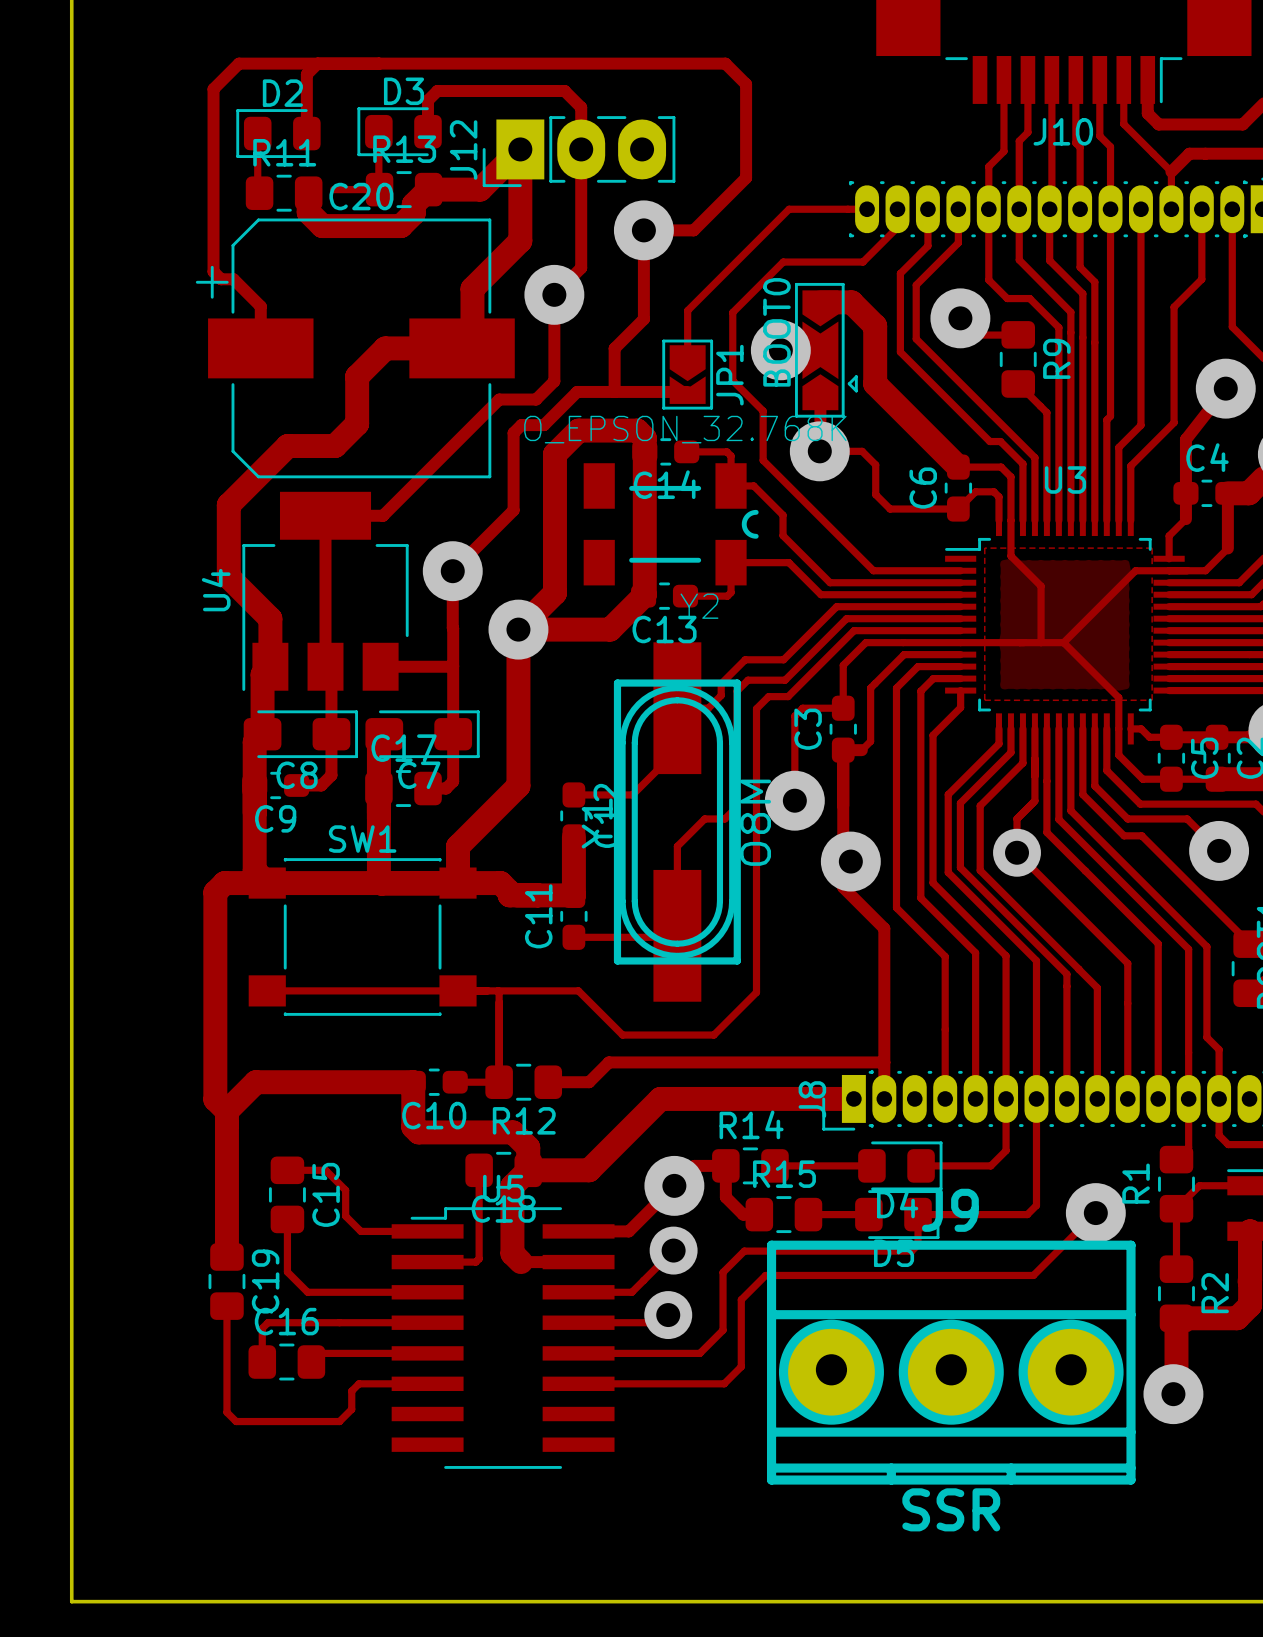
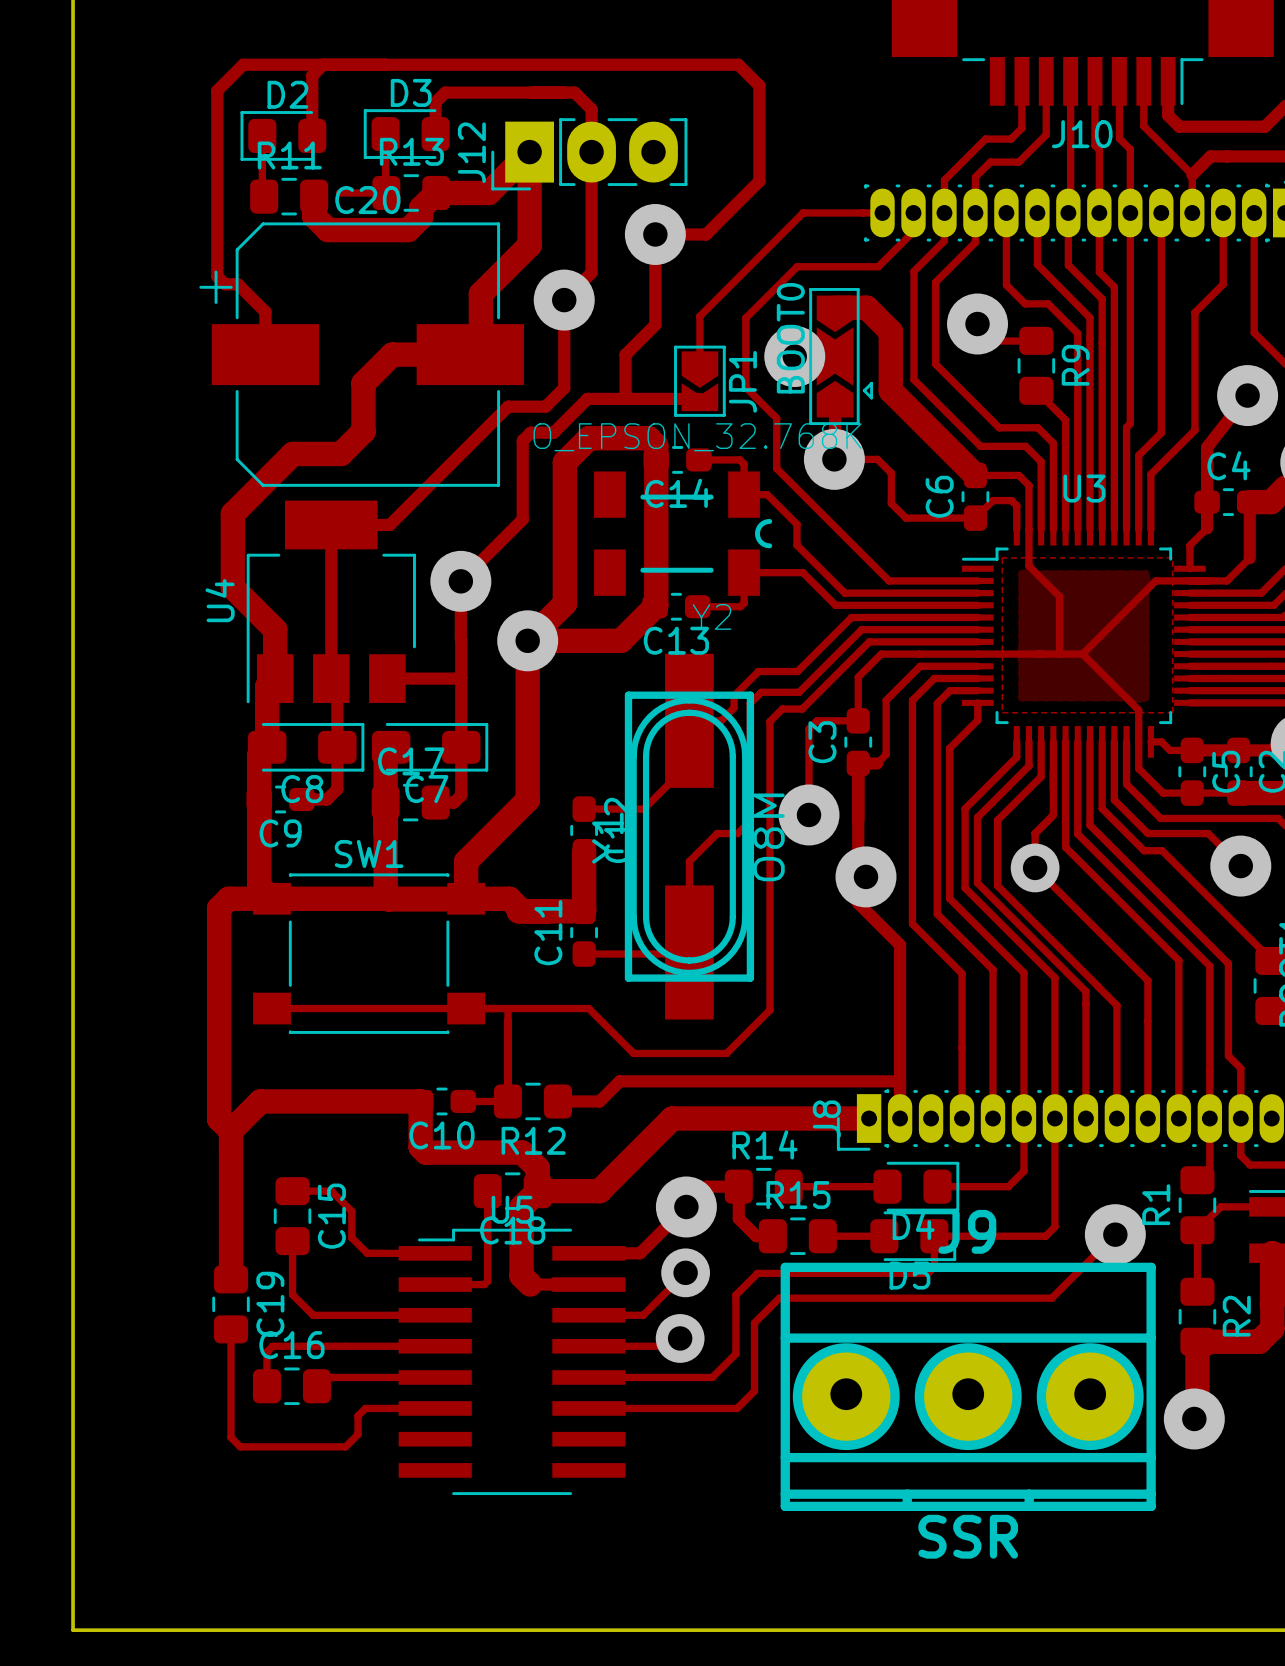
track: (1003, 125) (1003, 151) (988, 166) (988, 209) -> (1021, 128) (1010, 139) (985, 139) (944, 180) (944, 212)
track: (1019, 141) (1019, 209) -> (1037, 143) (1018, 162) (990, 162) (975, 177) (975, 212)
track: (927, 236) (927, 245) (900, 273) (900, 352) (989, 441) (1000, 441) (1022, 463) -> (944, 240) (914, 271) (914, 379) (980, 446) (1025, 446) (1041, 461) (1041, 472)
track: (958, 238) (958, 242) (916, 285) (916, 338) (1034, 457) -> (975, 242) (935, 282) (935, 364) (999, 427) (1037, 427) (1053, 443) (1053, 465)

